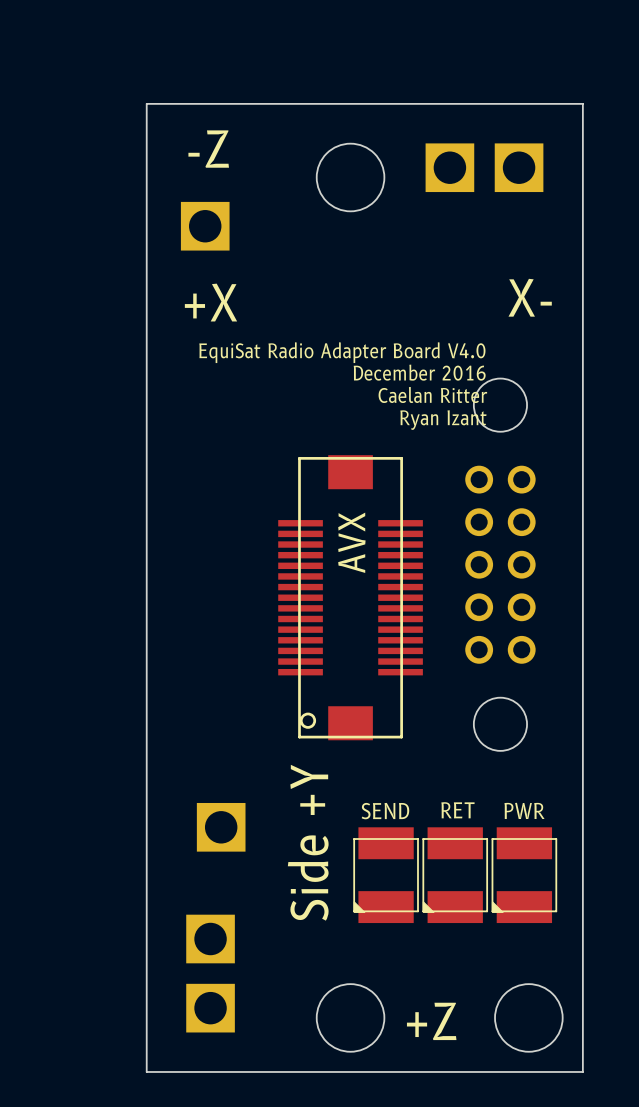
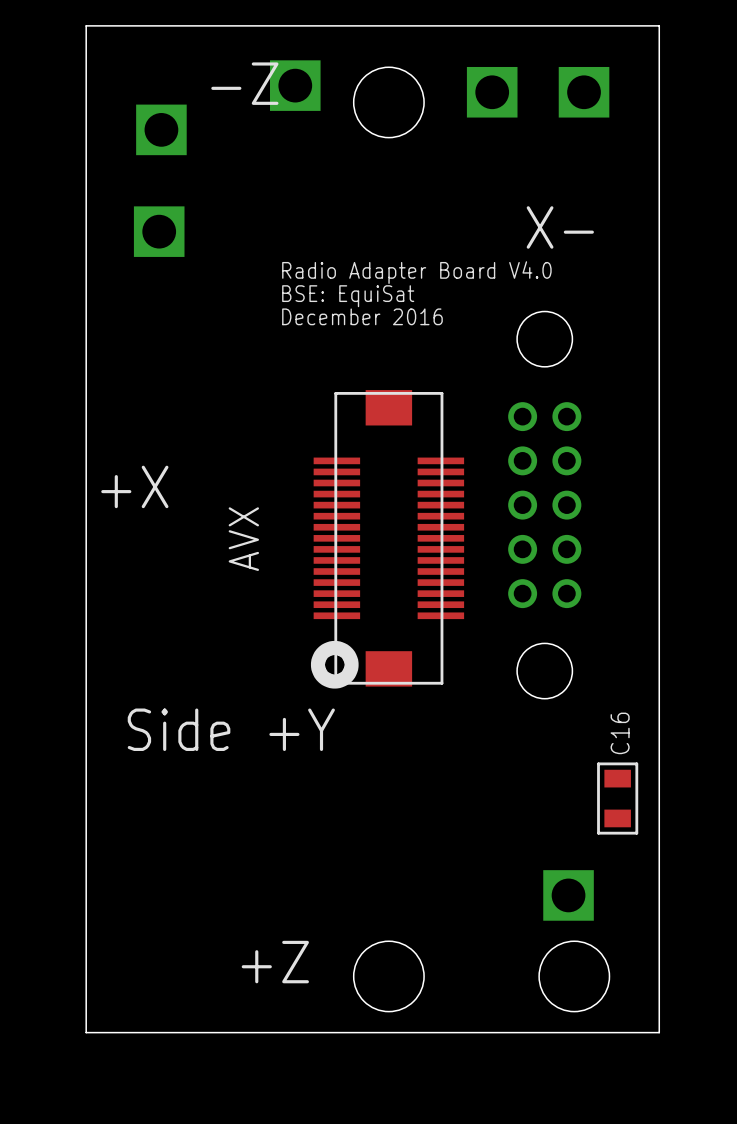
board edge: (146, 103) (146, 1071) -> (176, 25) (86, 25) (86, 1032) (176, 1032)
board edge: (582, 103) (582, 1071) -> (630, 25) (659, 25) (659, 1032) (630, 1032)
text position: -Z (208, 149) -> -Z (244, 83)
part: none -> (295, 85)
part position: (519, 167) -> (584, 92)
part: none -> (161, 129)
part: (205, 226) -> none
part: none -> (159, 231)
text position: +X (211, 302) -> +X (134, 486)
text: EquiSat Radio Adapter Board V4.0 (342, 352) -> Radio Adapter Board V4.0 (416, 272)
text: none -> BSE: EquiSat (348, 296)
text position: December 2016 (419, 372) -> December 2016 (362, 316)
text: Caelan Ritter (432, 394) -> none
text: Ryan Izant (443, 420) -> none
AVX footprint: [278, 455, 423, 741] -> [310, 390, 465, 689]
AVX name position: AVX (351, 542) -> AVX (243, 539)
part: (221, 827) -> none
text rotation: 0° (308, 842) -> 90° clockwise (231, 729)
C16: none -> (617, 798)
SEND: (386, 875) -> none
RET: (455, 875) -> none
PWR: (524, 875) -> none
part: (210, 939) -> none
part: none -> (568, 895)
part: (210, 1008) -> none
text position: +Z (431, 1021) -> +Z (275, 962)

